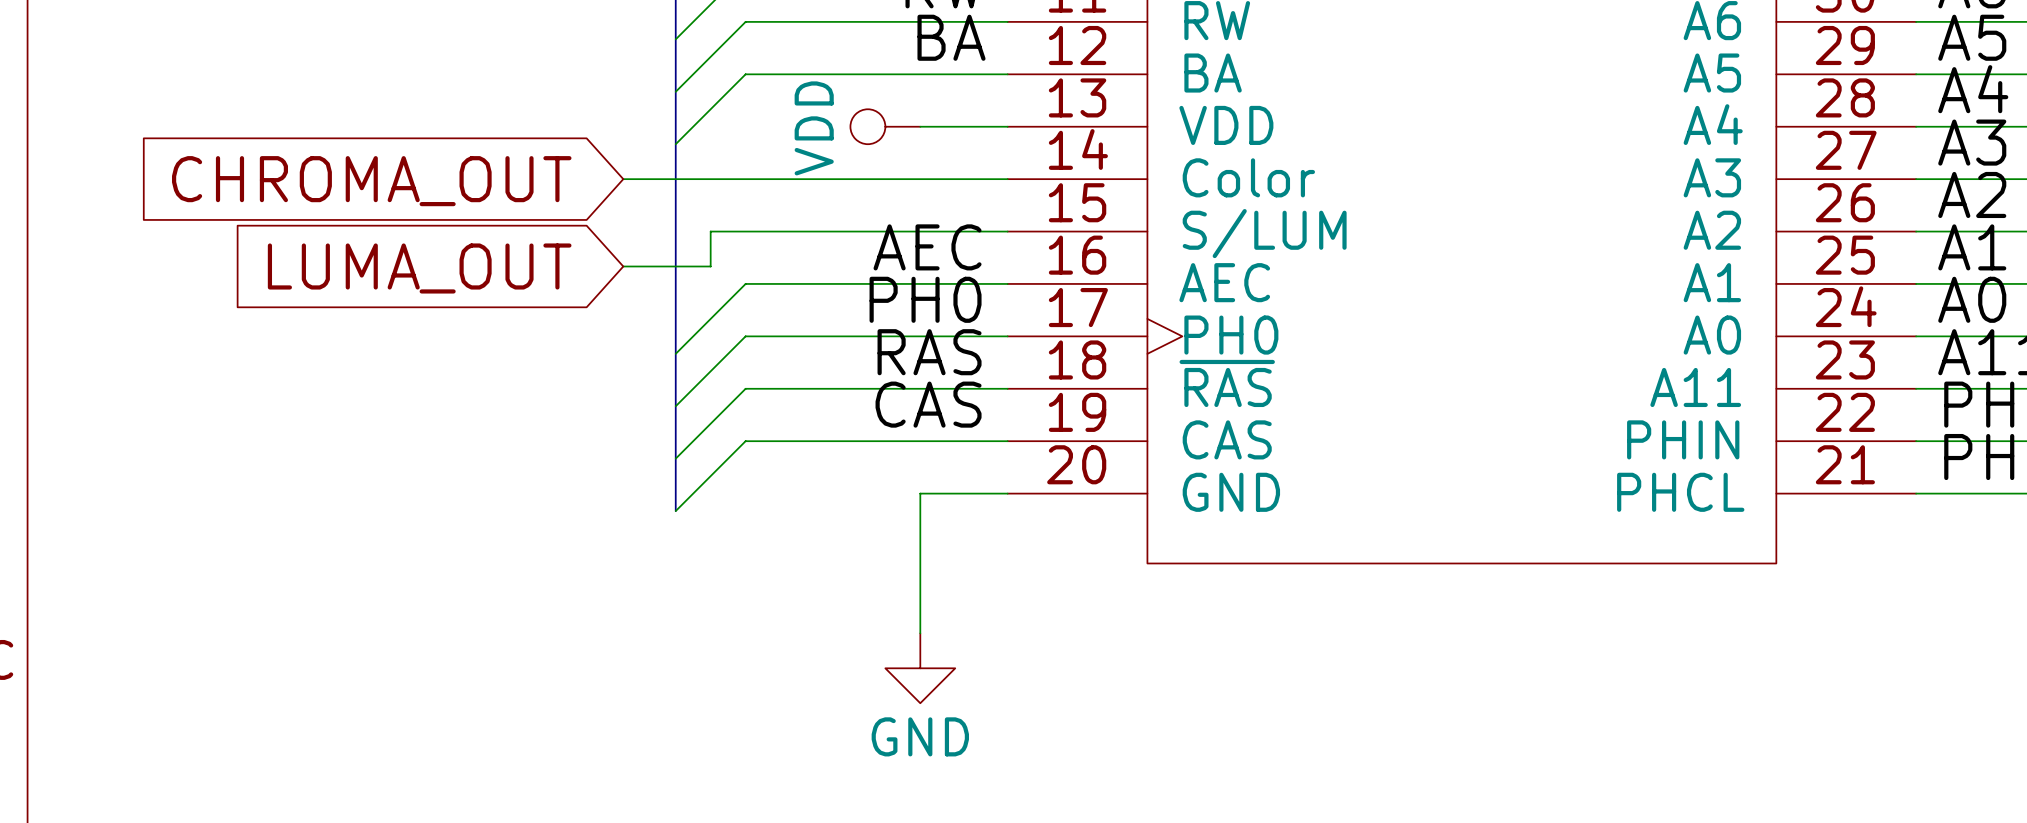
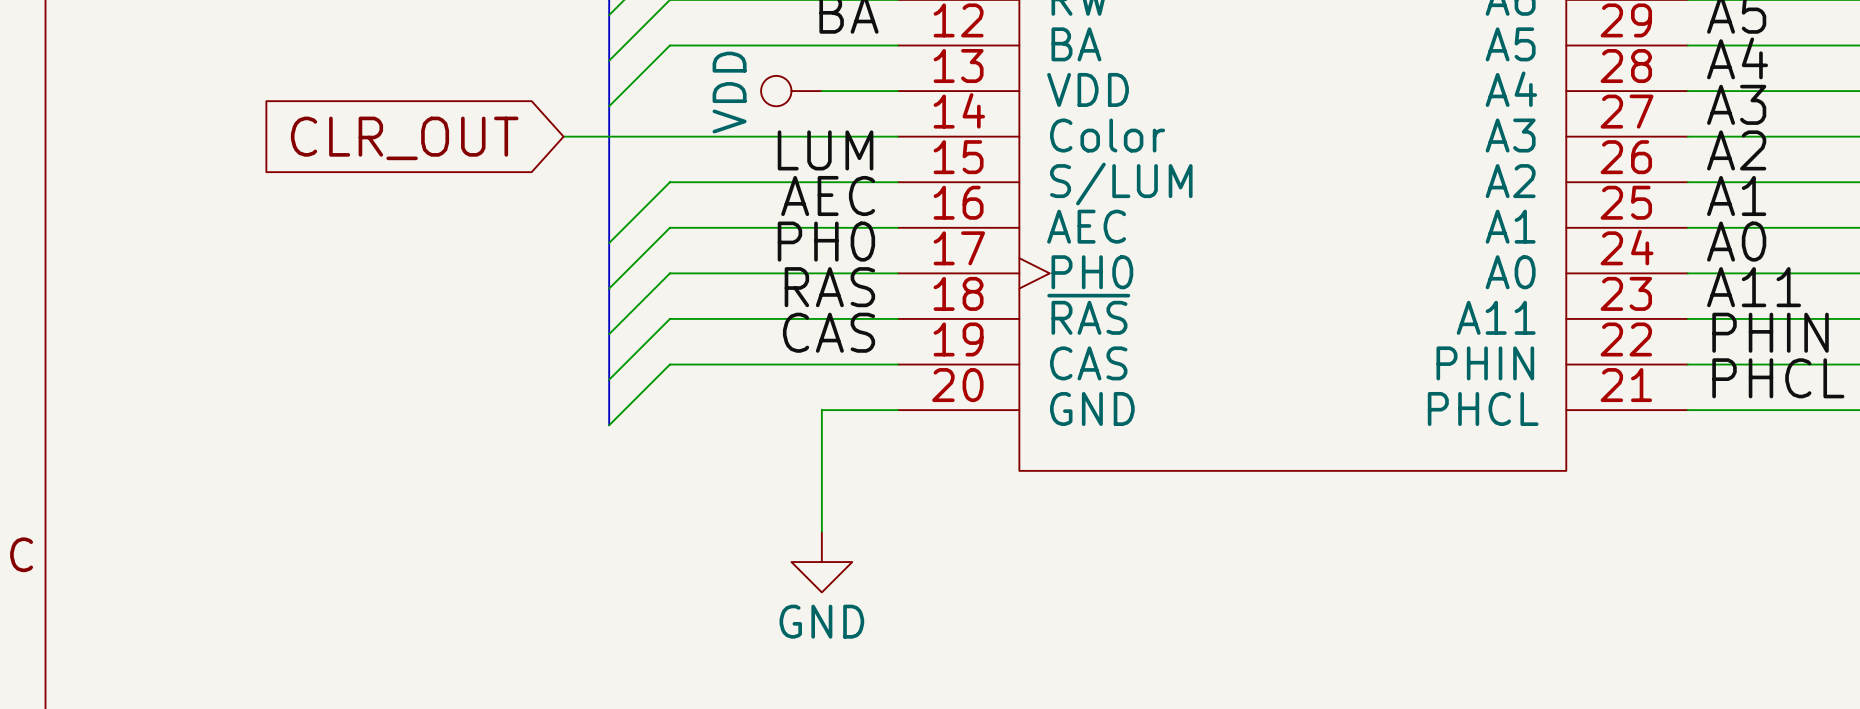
global label: CHROMA_OUT (371, 181) -> CLR_OUT (404, 138)
label: none -> LUM (825, 150)
wire: (745, 231) (710, 231) (710, 266) (623, 266) -> (669, 182) (609, 243)
global label: LUMA_OUT (419, 268) -> none

